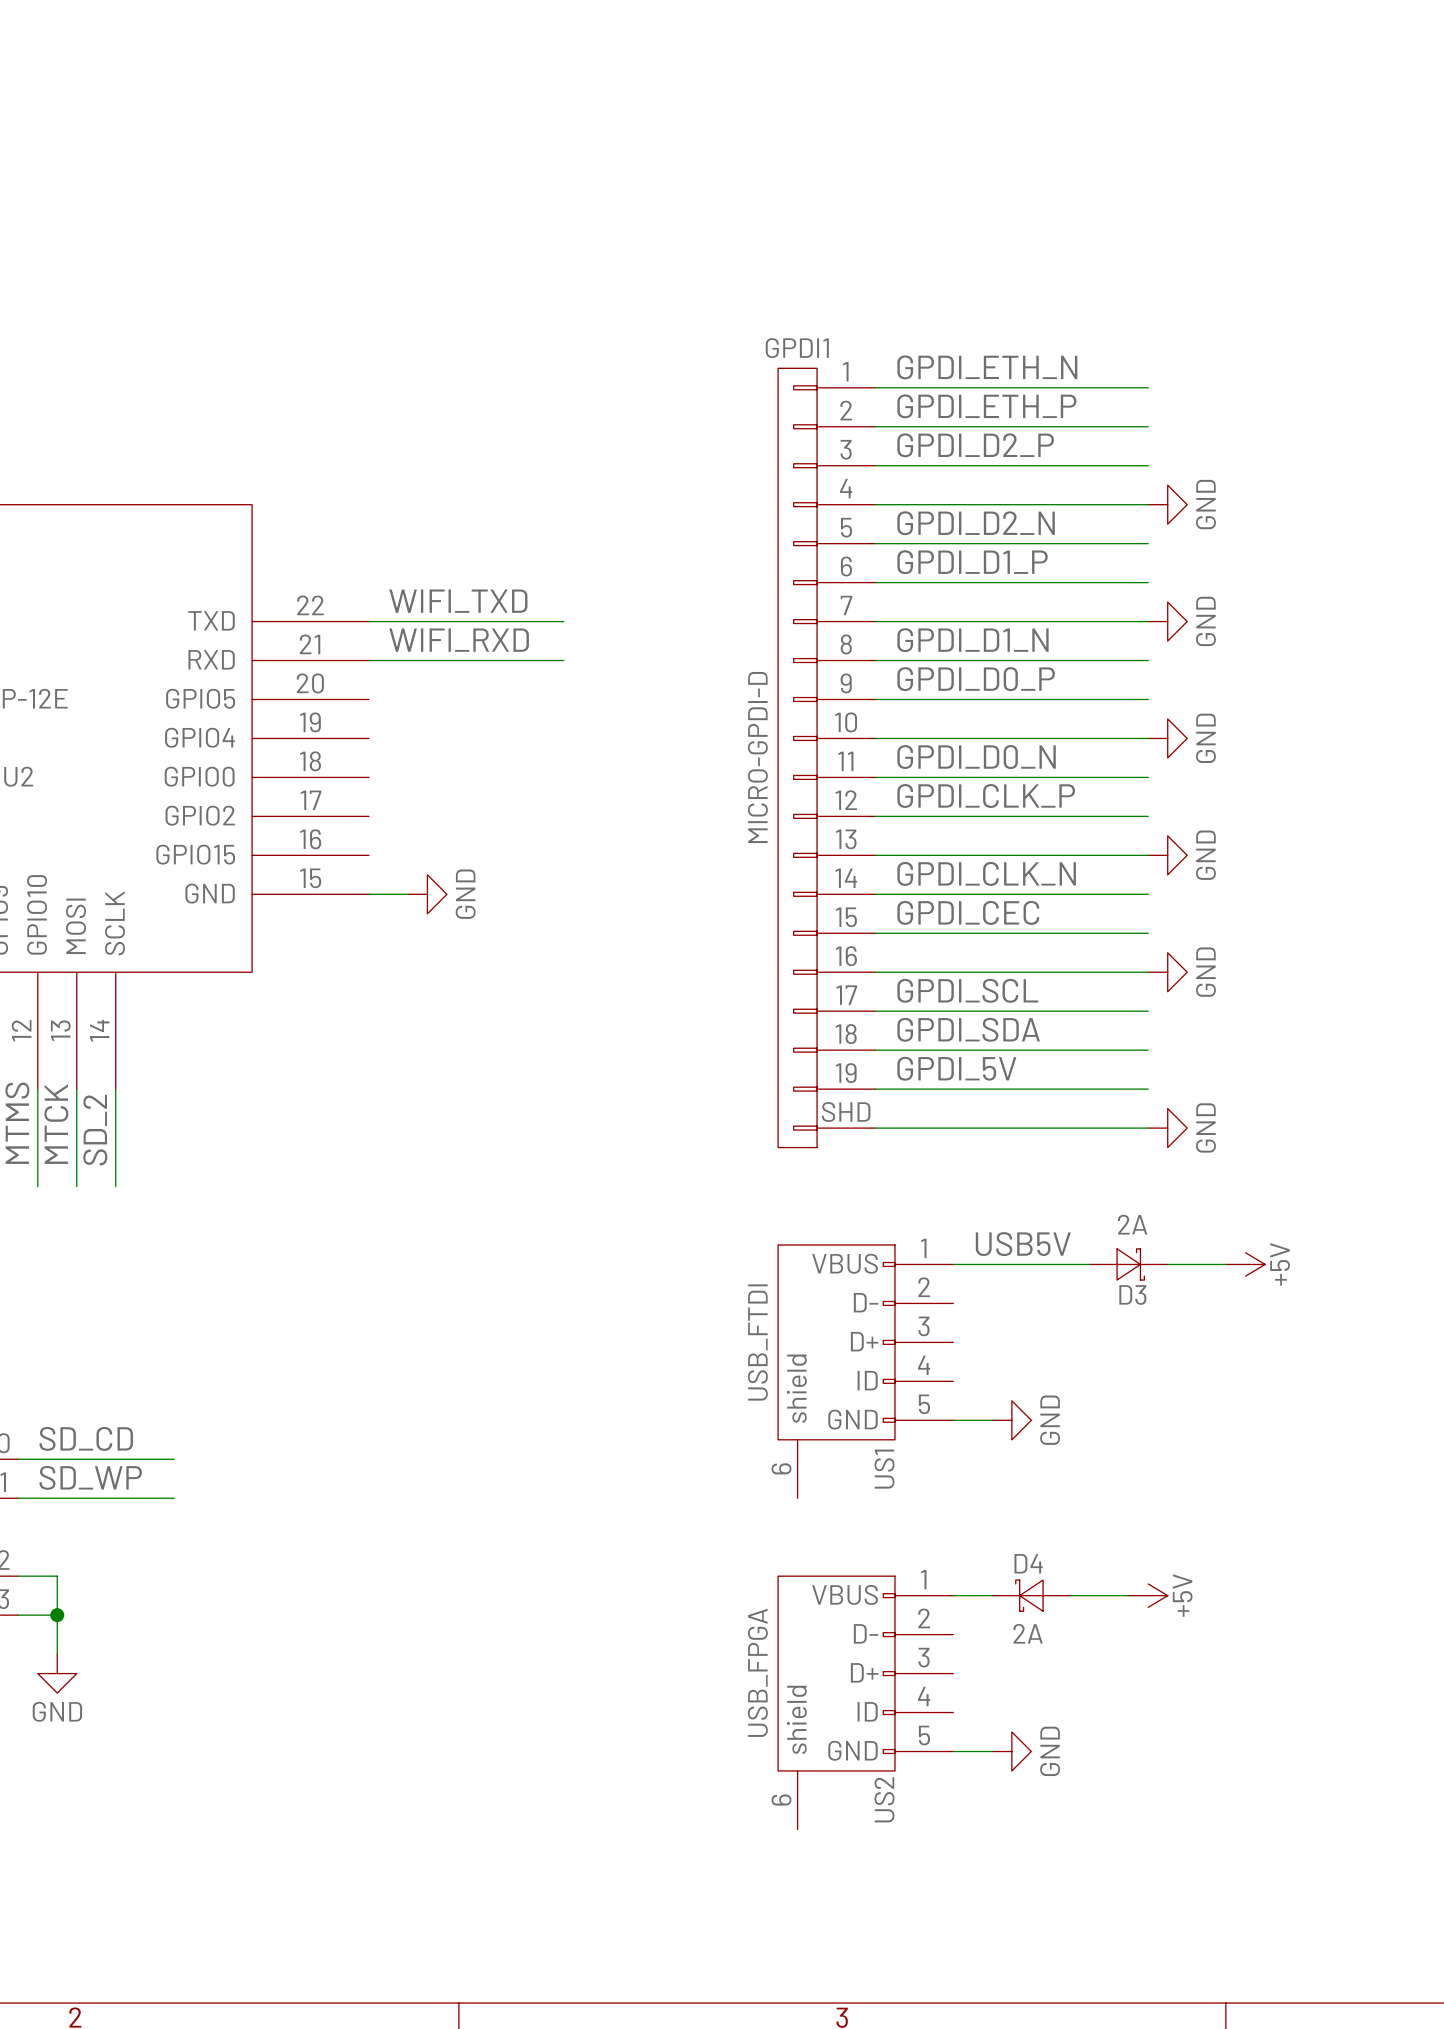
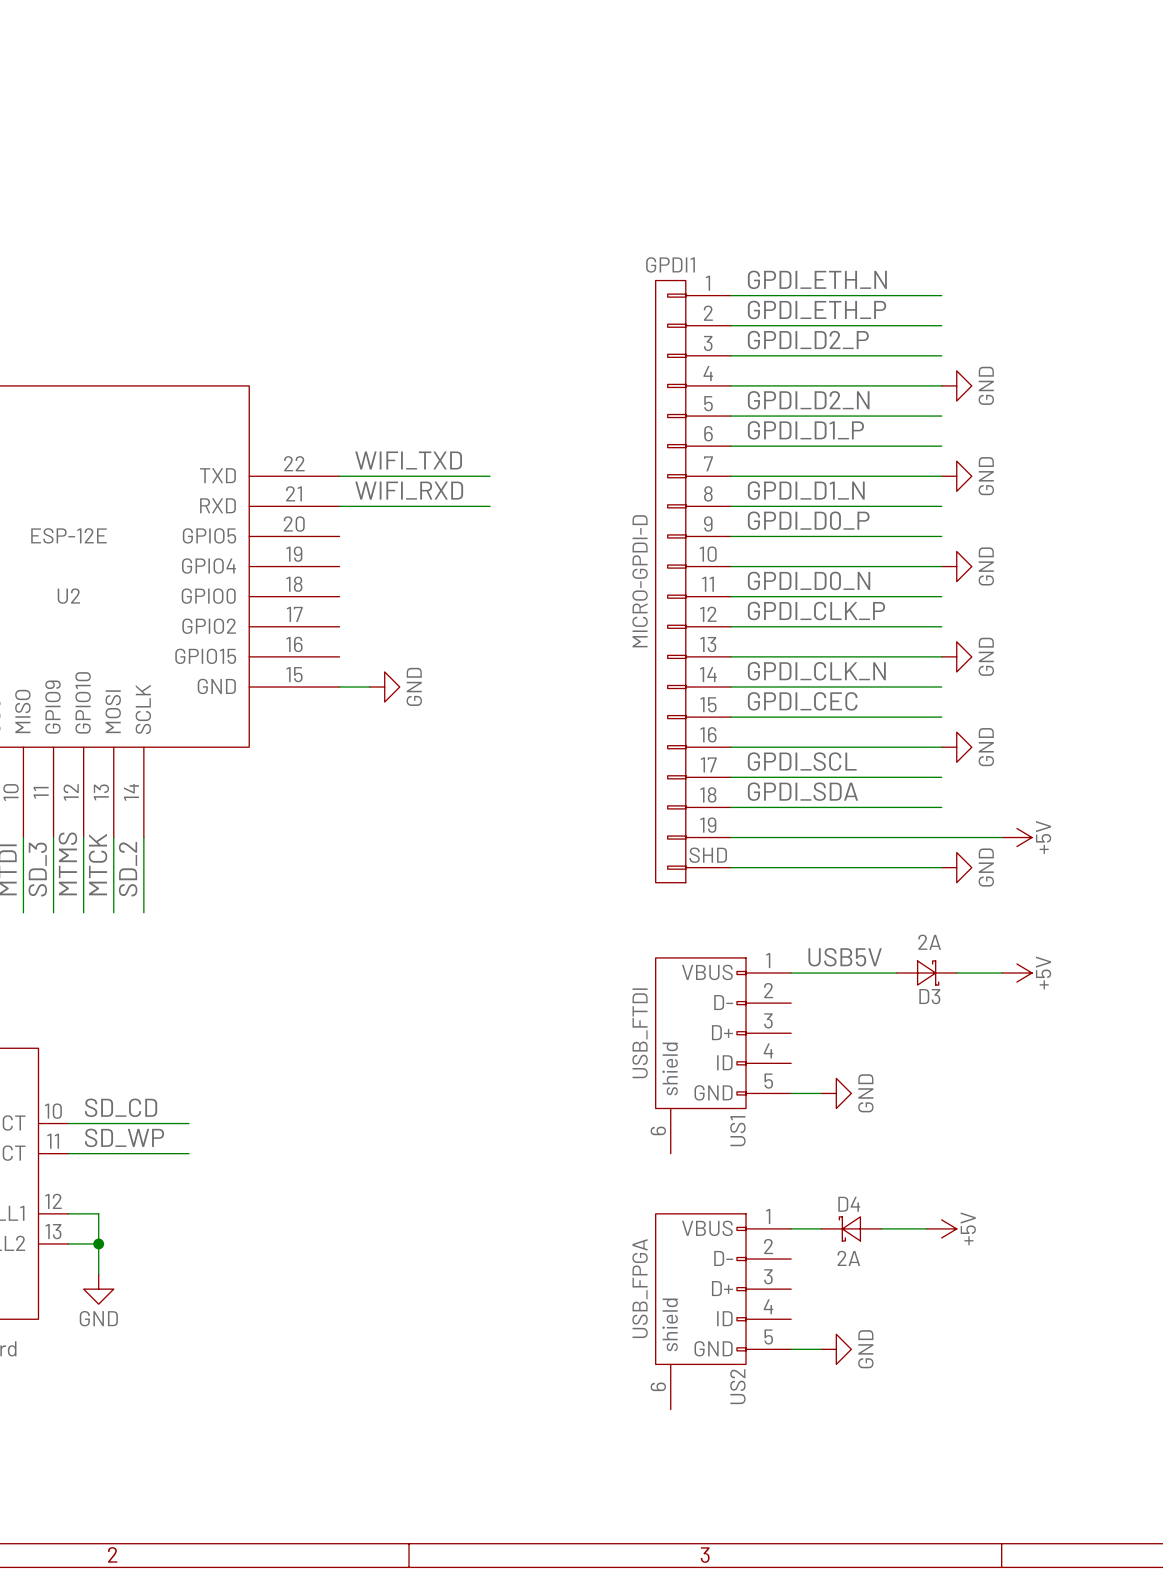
label: GPDI_5V (956, 1068) -> none
wire: none -> (941, 837) (1001, 837)
power symbol: none -> +5V (1016, 837)

